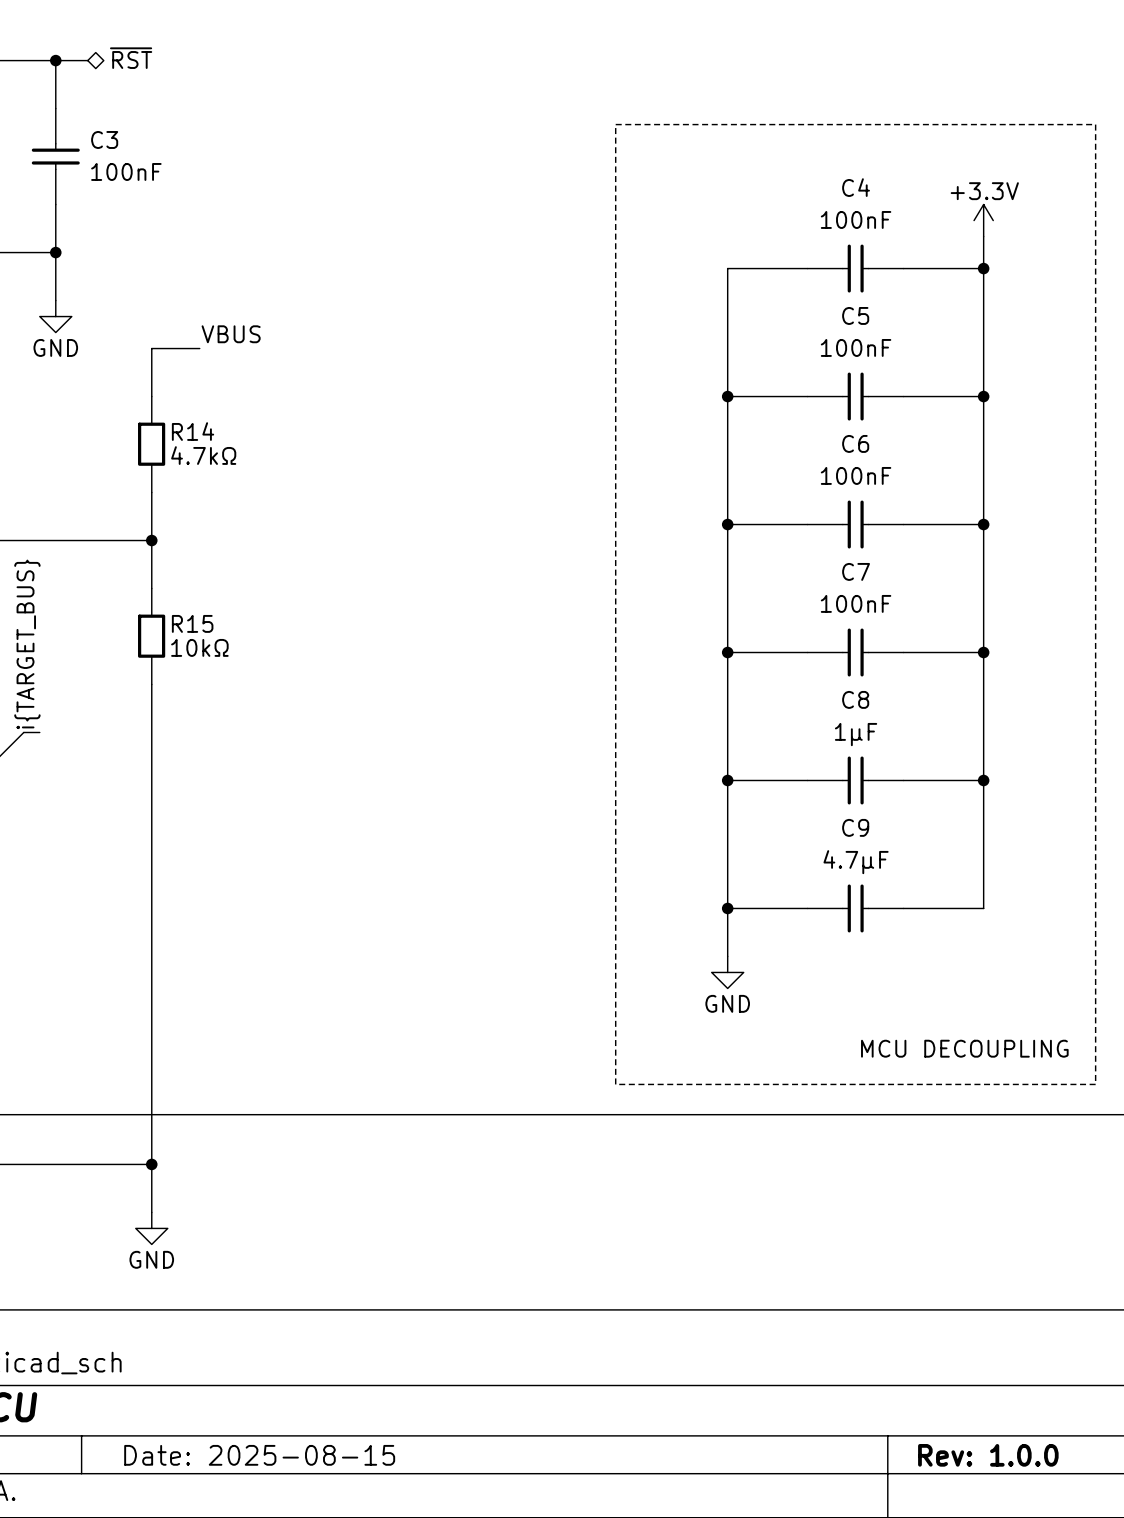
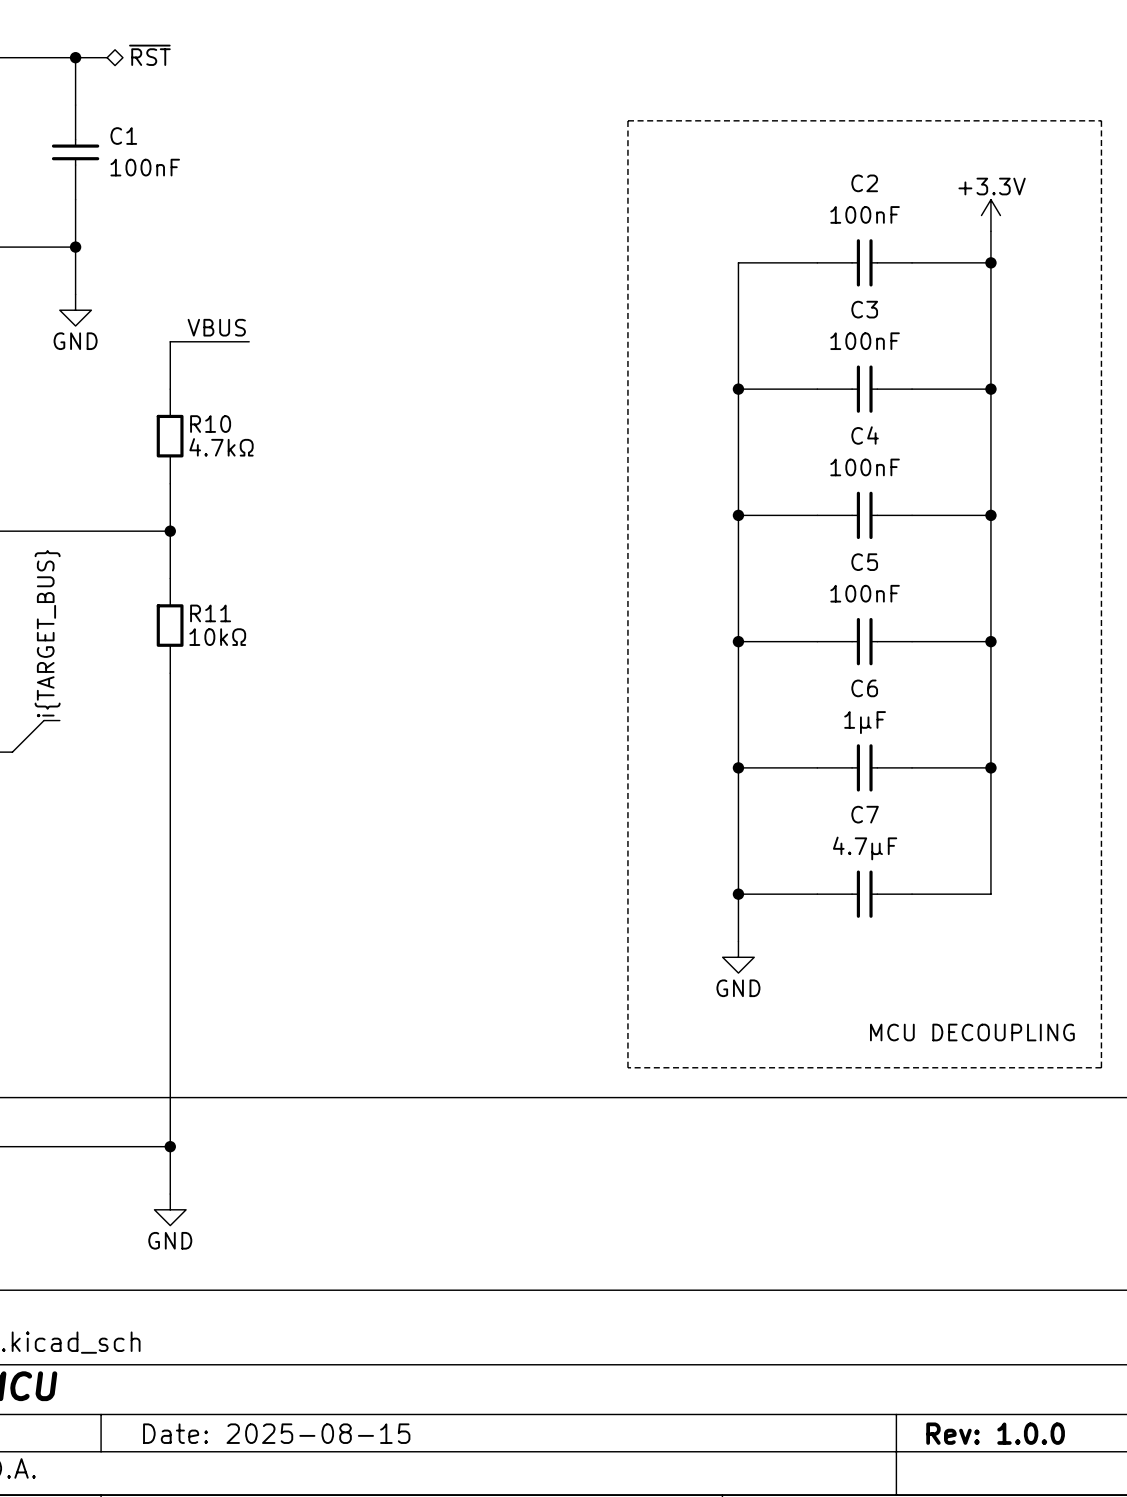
C3 name: C3 (104, 139) -> C1 (123, 136)
C4 name: C4 (856, 187) -> C2 (864, 183)
C5 name: C5 (855, 315) -> C3 (864, 309)
label position: VBUS (231, 334) -> VBUS (216, 327)
wire: none -> (217, 341) (249, 341)
R14 name: R14 (193, 431) -> R10 (210, 424)
C6 name: C6 (855, 443) -> C4 (865, 435)
C7 name: C7 (856, 571) -> C5 (864, 562)
R15 name: R15 (192, 623) -> R11 (210, 613)
C8 name: C8 (855, 699) -> C6 (864, 688)
C9 name: C9 (855, 827) -> C7 (865, 814)

